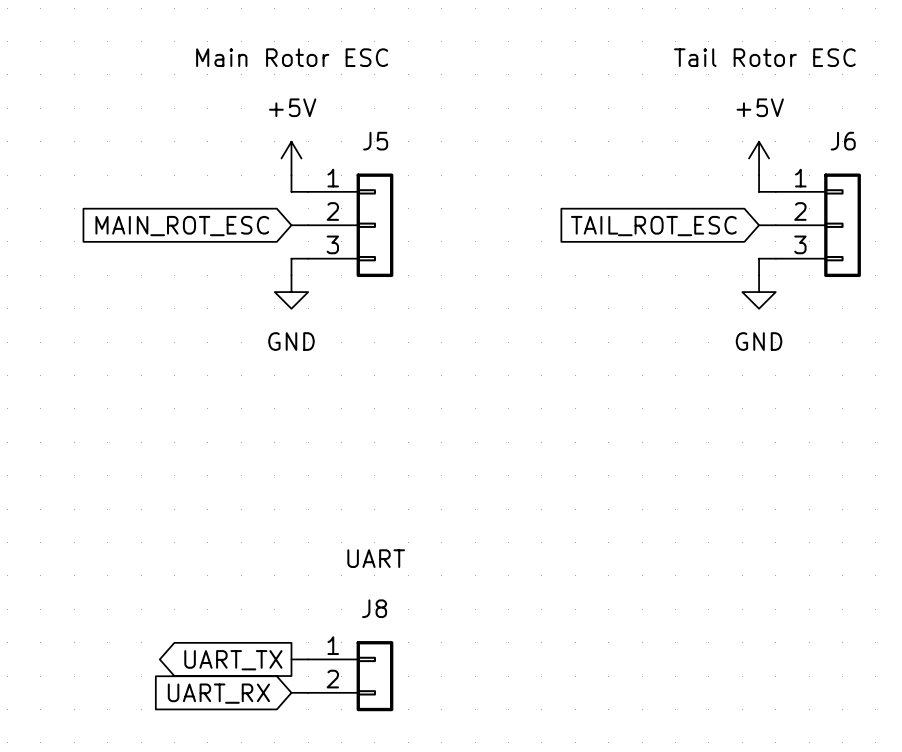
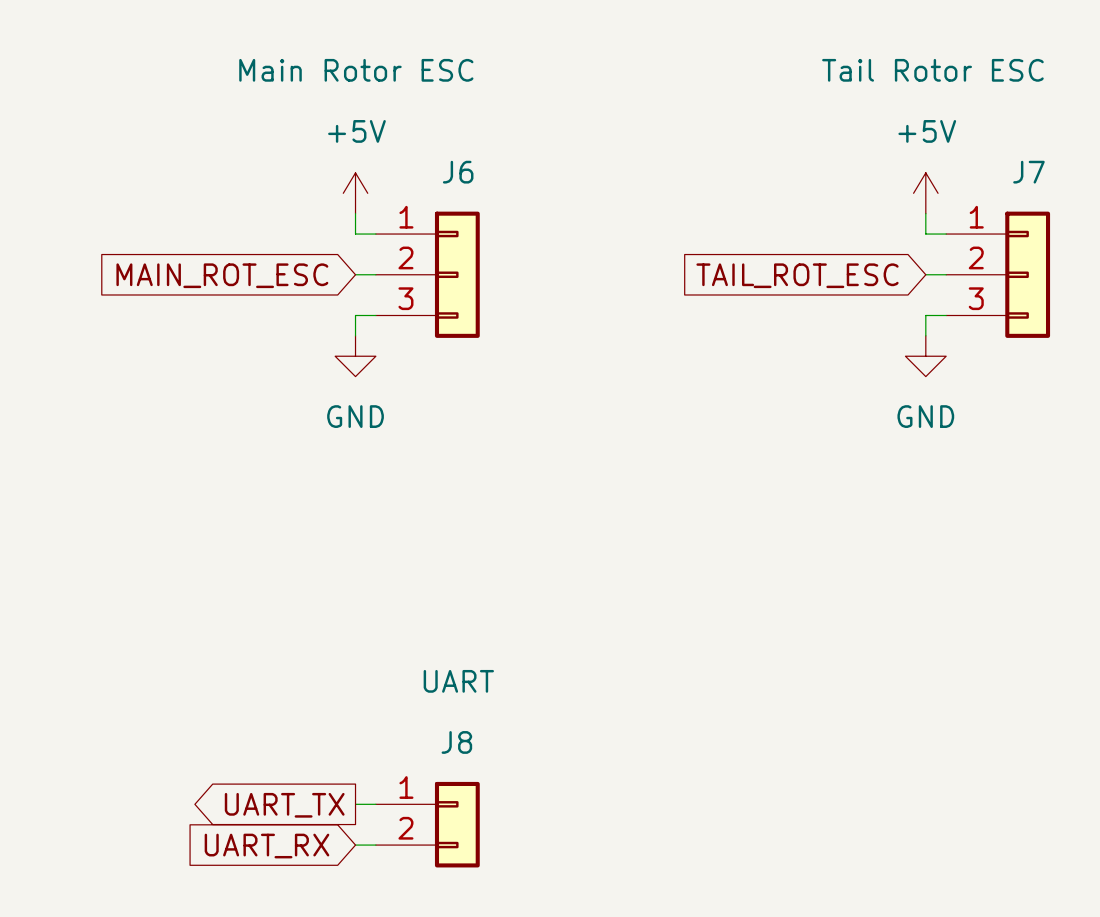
J5 name: J5 (375, 141) -> J6 (458, 172)
J6 name: J6 (843, 141) -> J7 (1028, 172)

